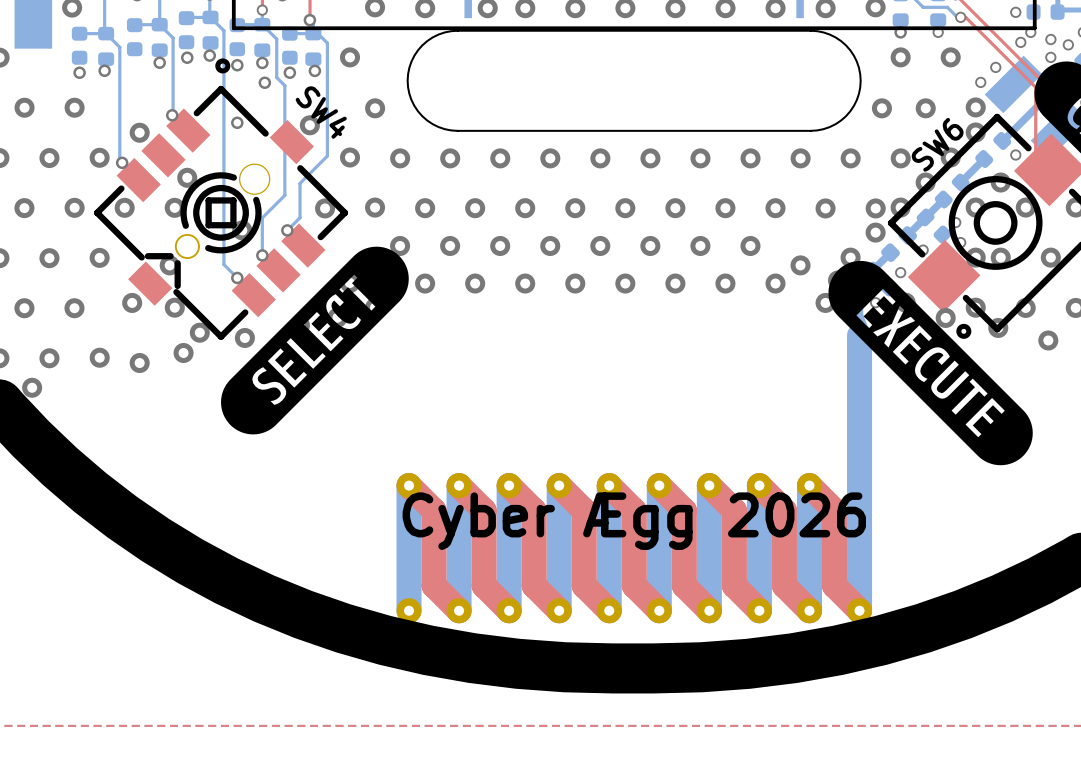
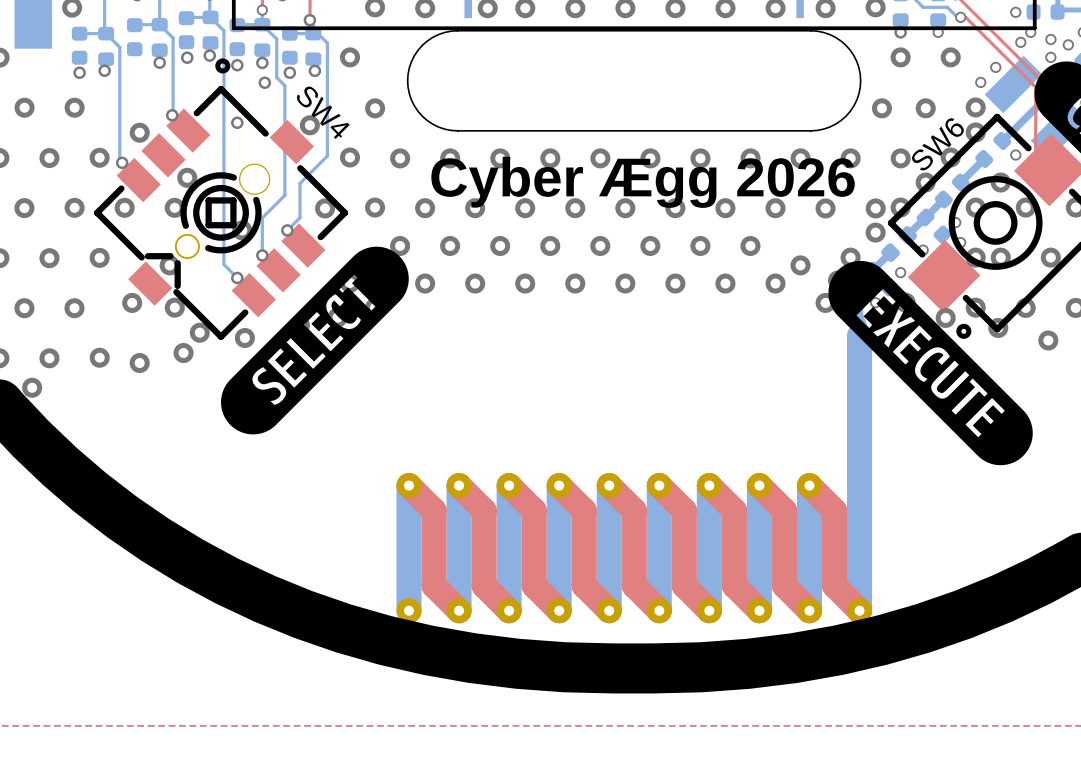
text position: Cyber Ægg 2026 (634, 521) -> Cyber Ægg 2026 (643, 182)

